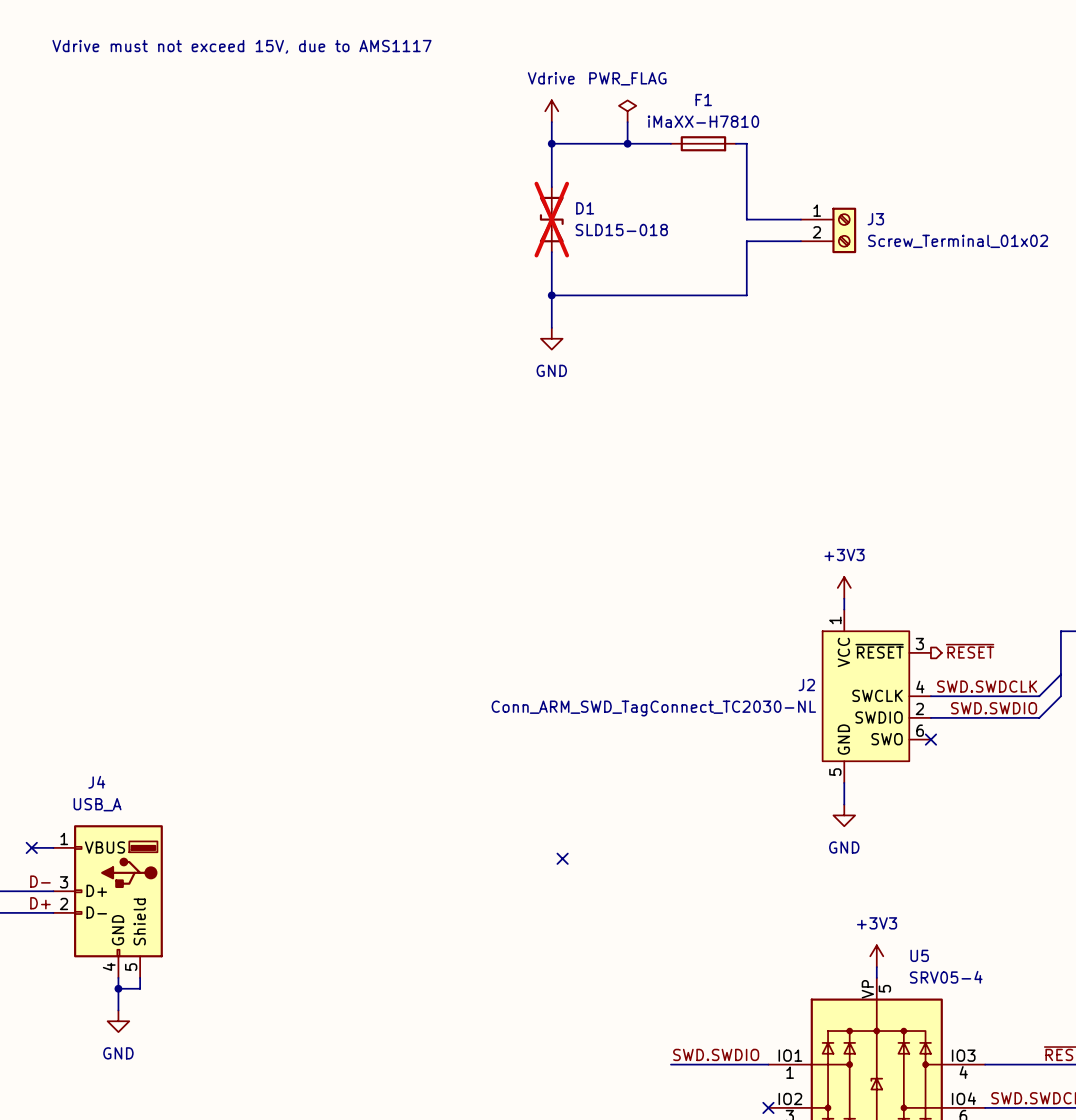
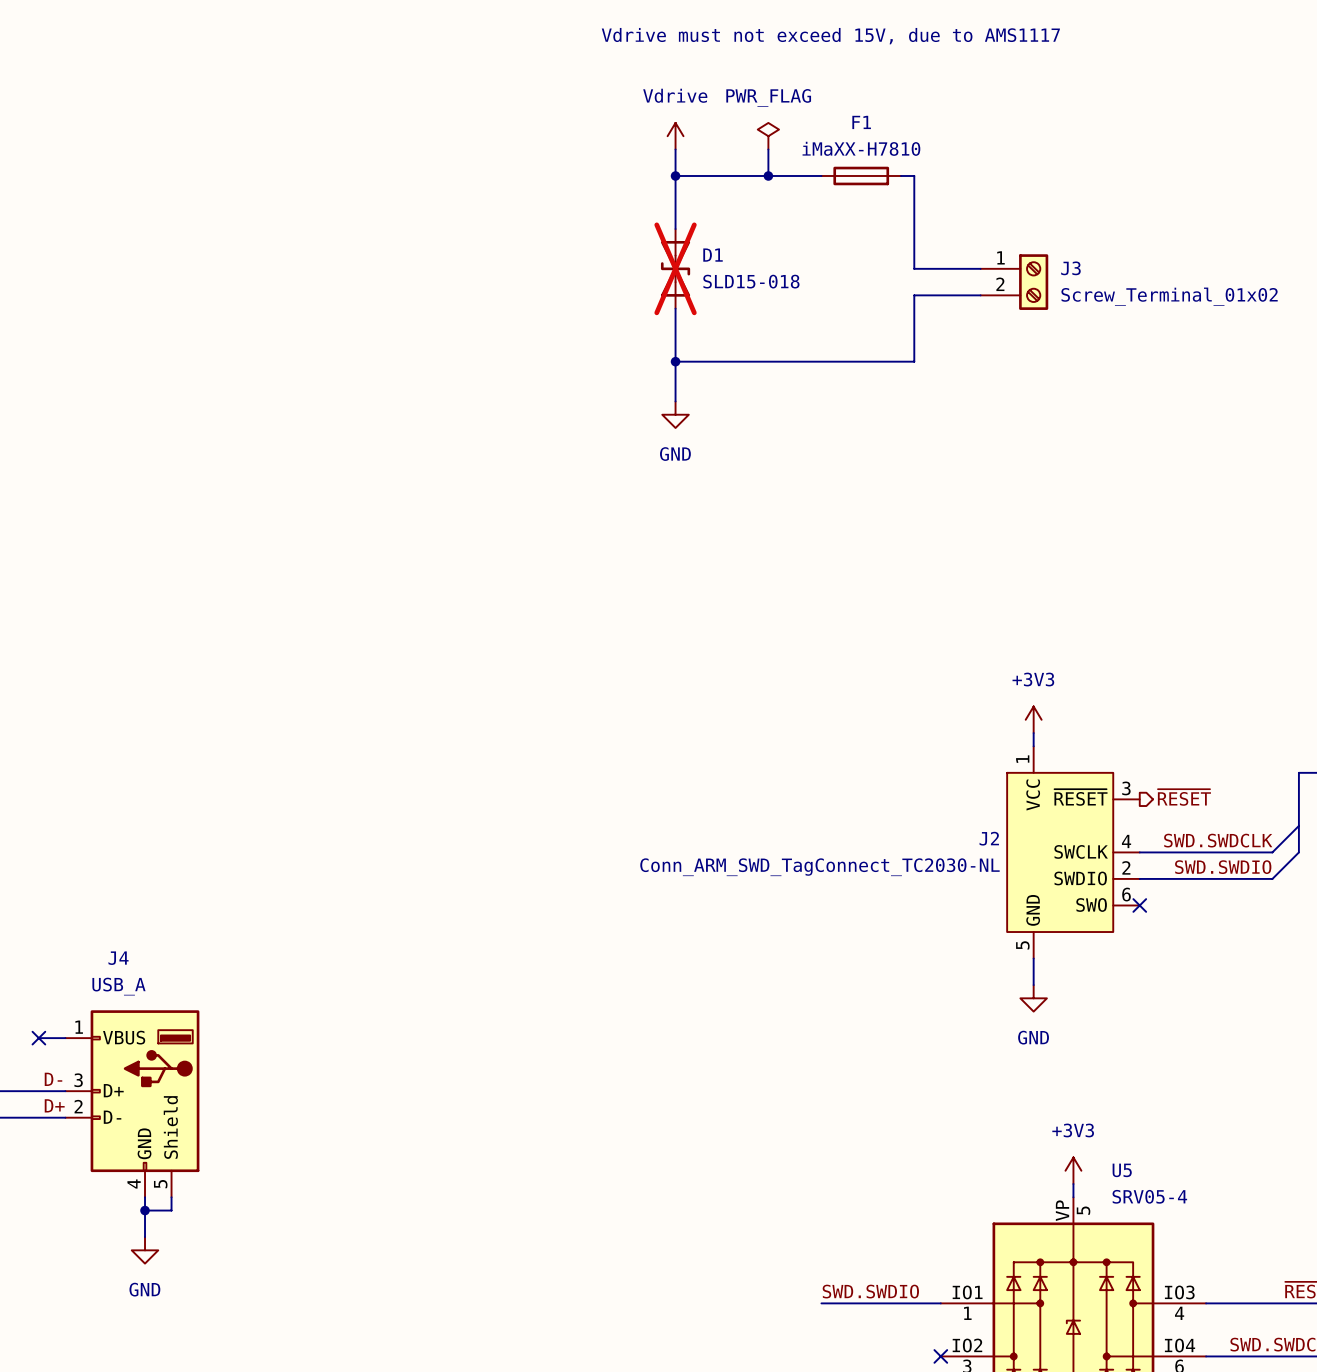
text: none -> Vdrive must not exceed 15V, due to AMS1117 (830, 36)
text: Vdrive must not exceed 15V, due to AMS1117 (241, 46) -> none
no-connect mark: (562, 858) -> none

